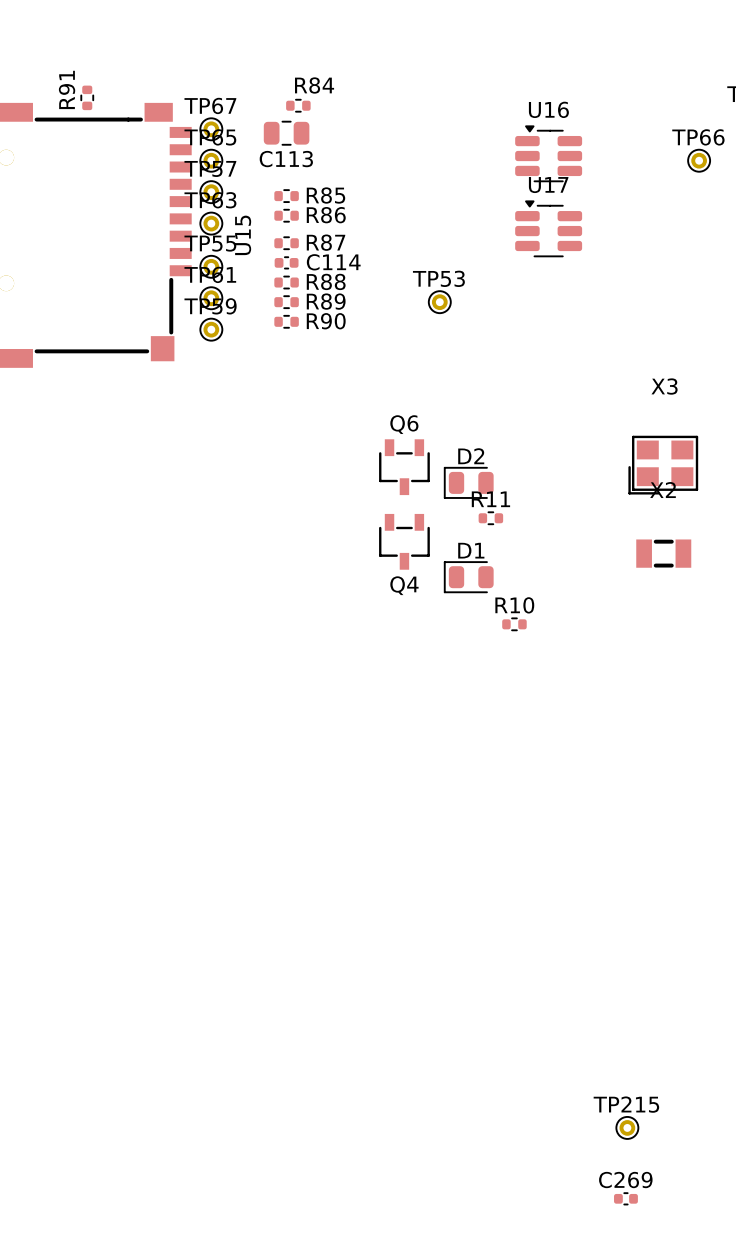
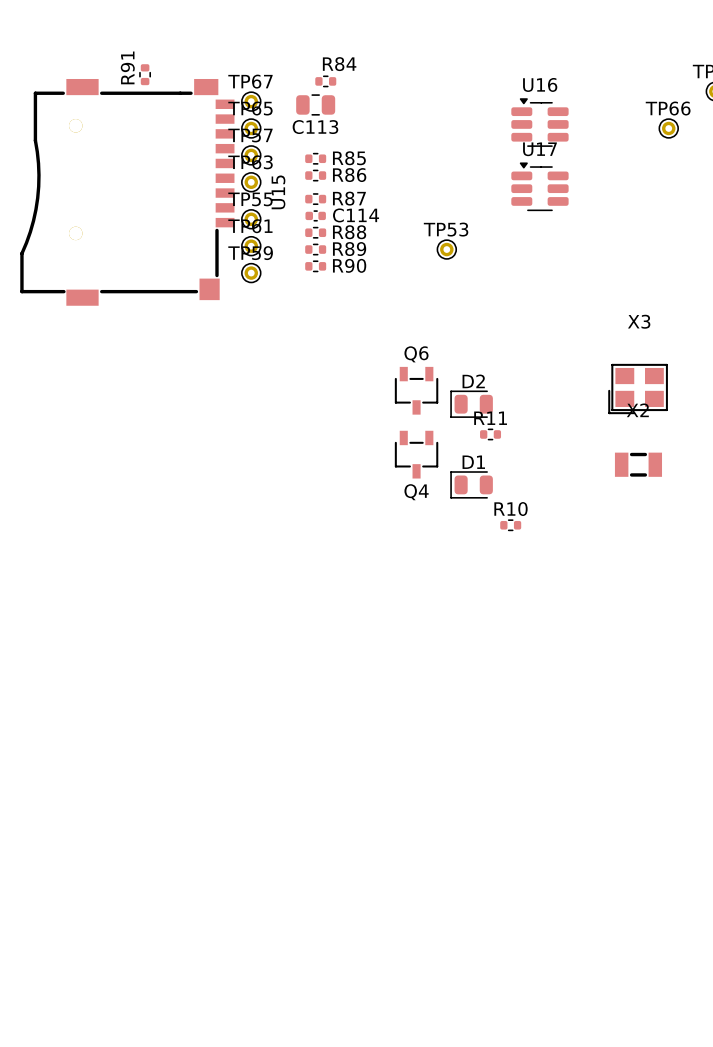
TP215: (627, 1127) -> none
C269: (625, 1198) -> none

